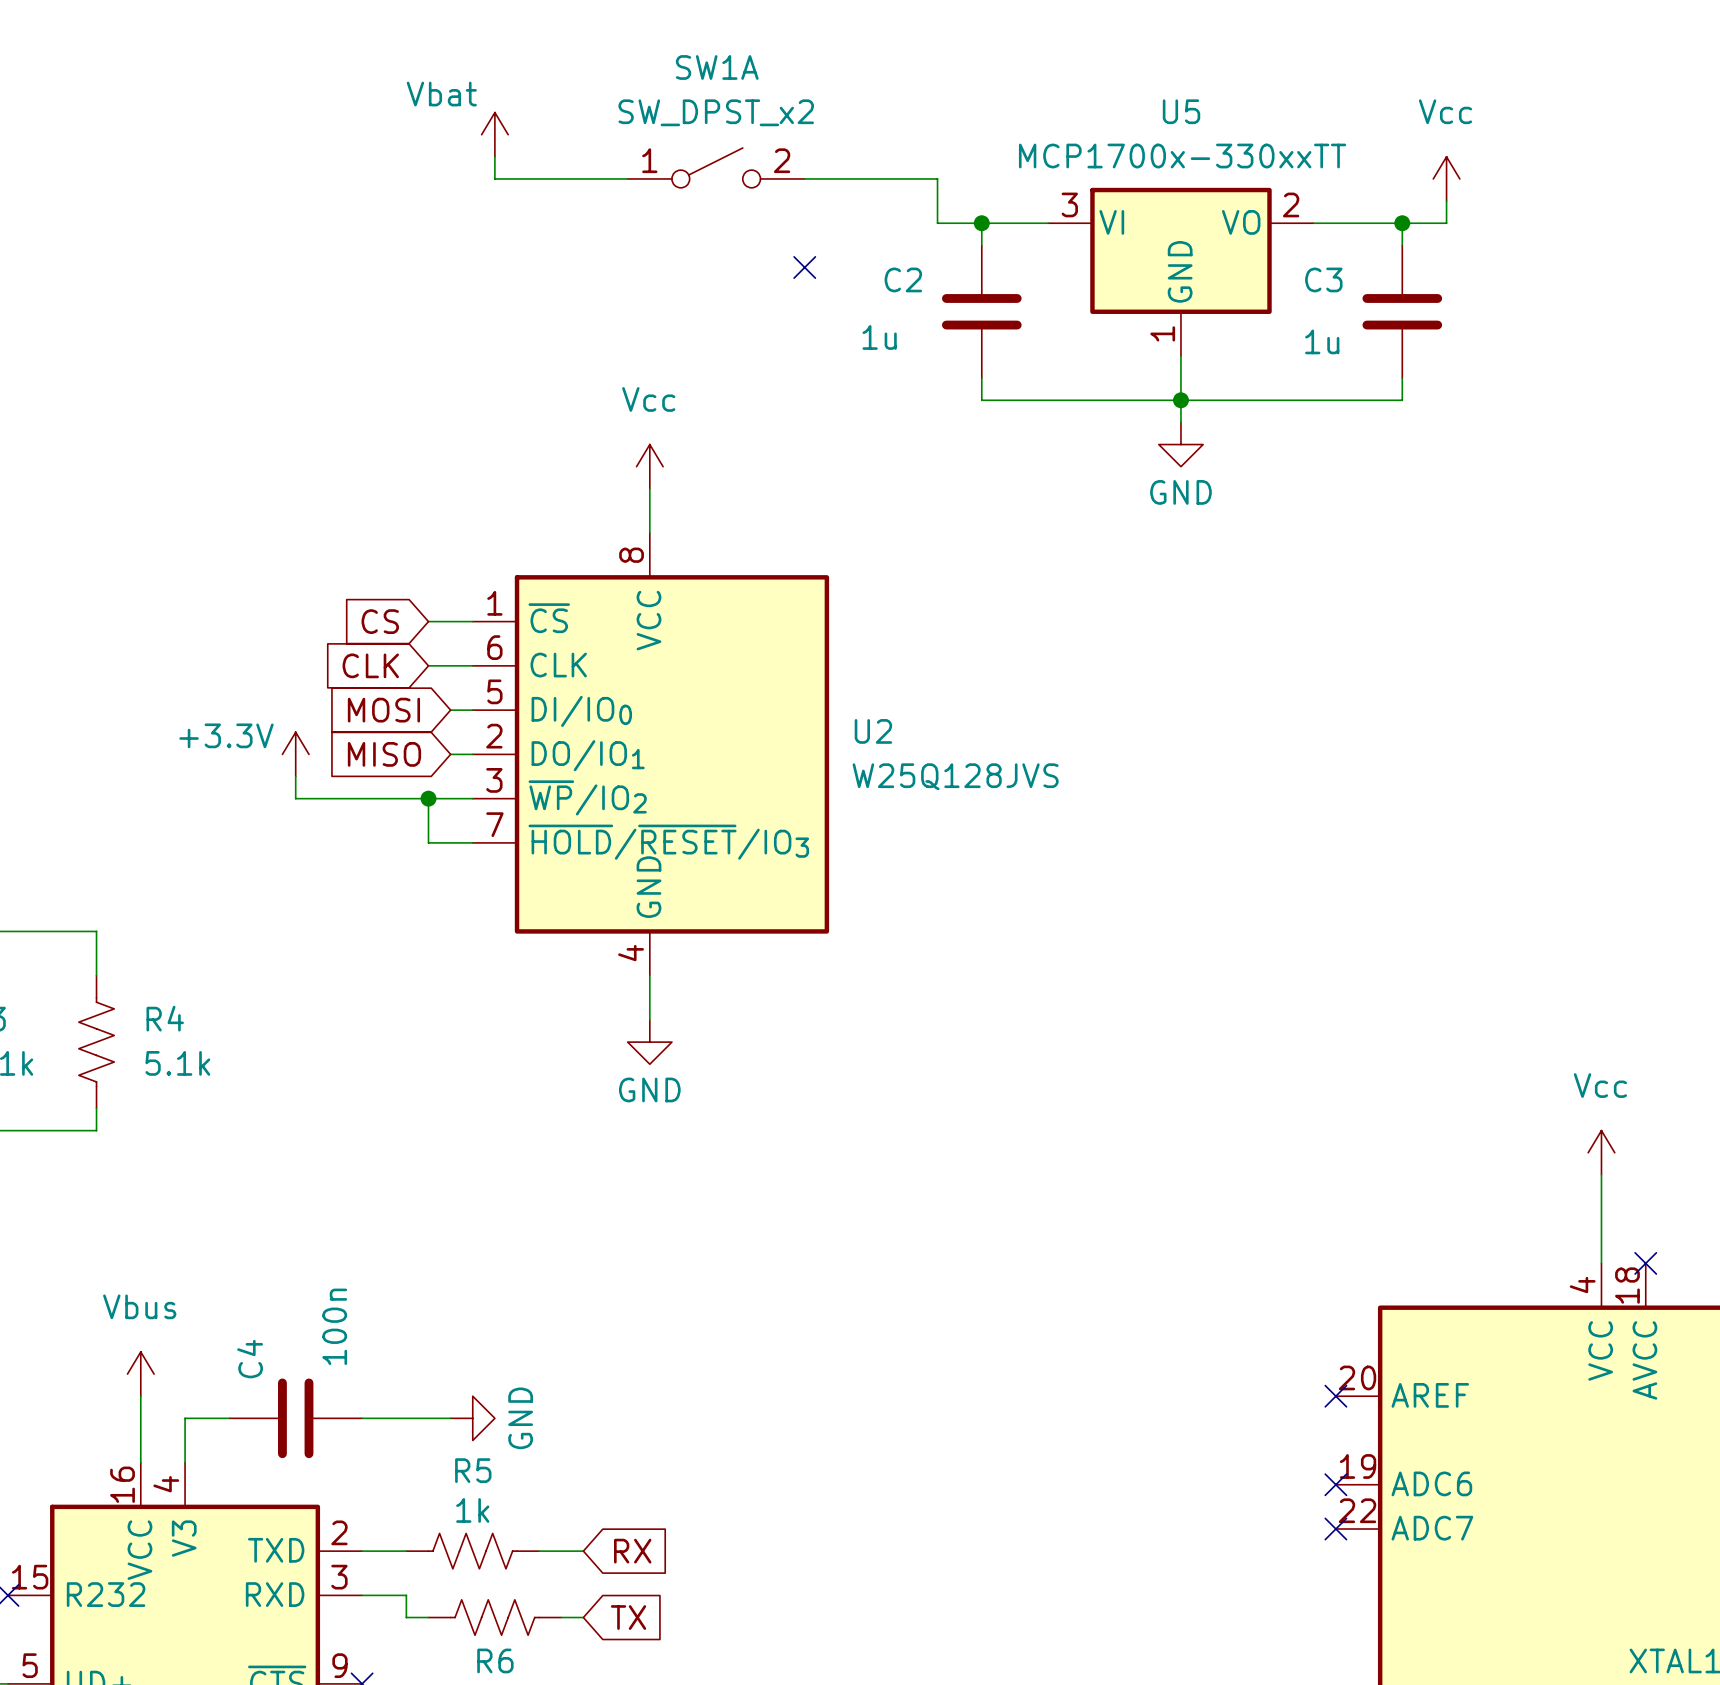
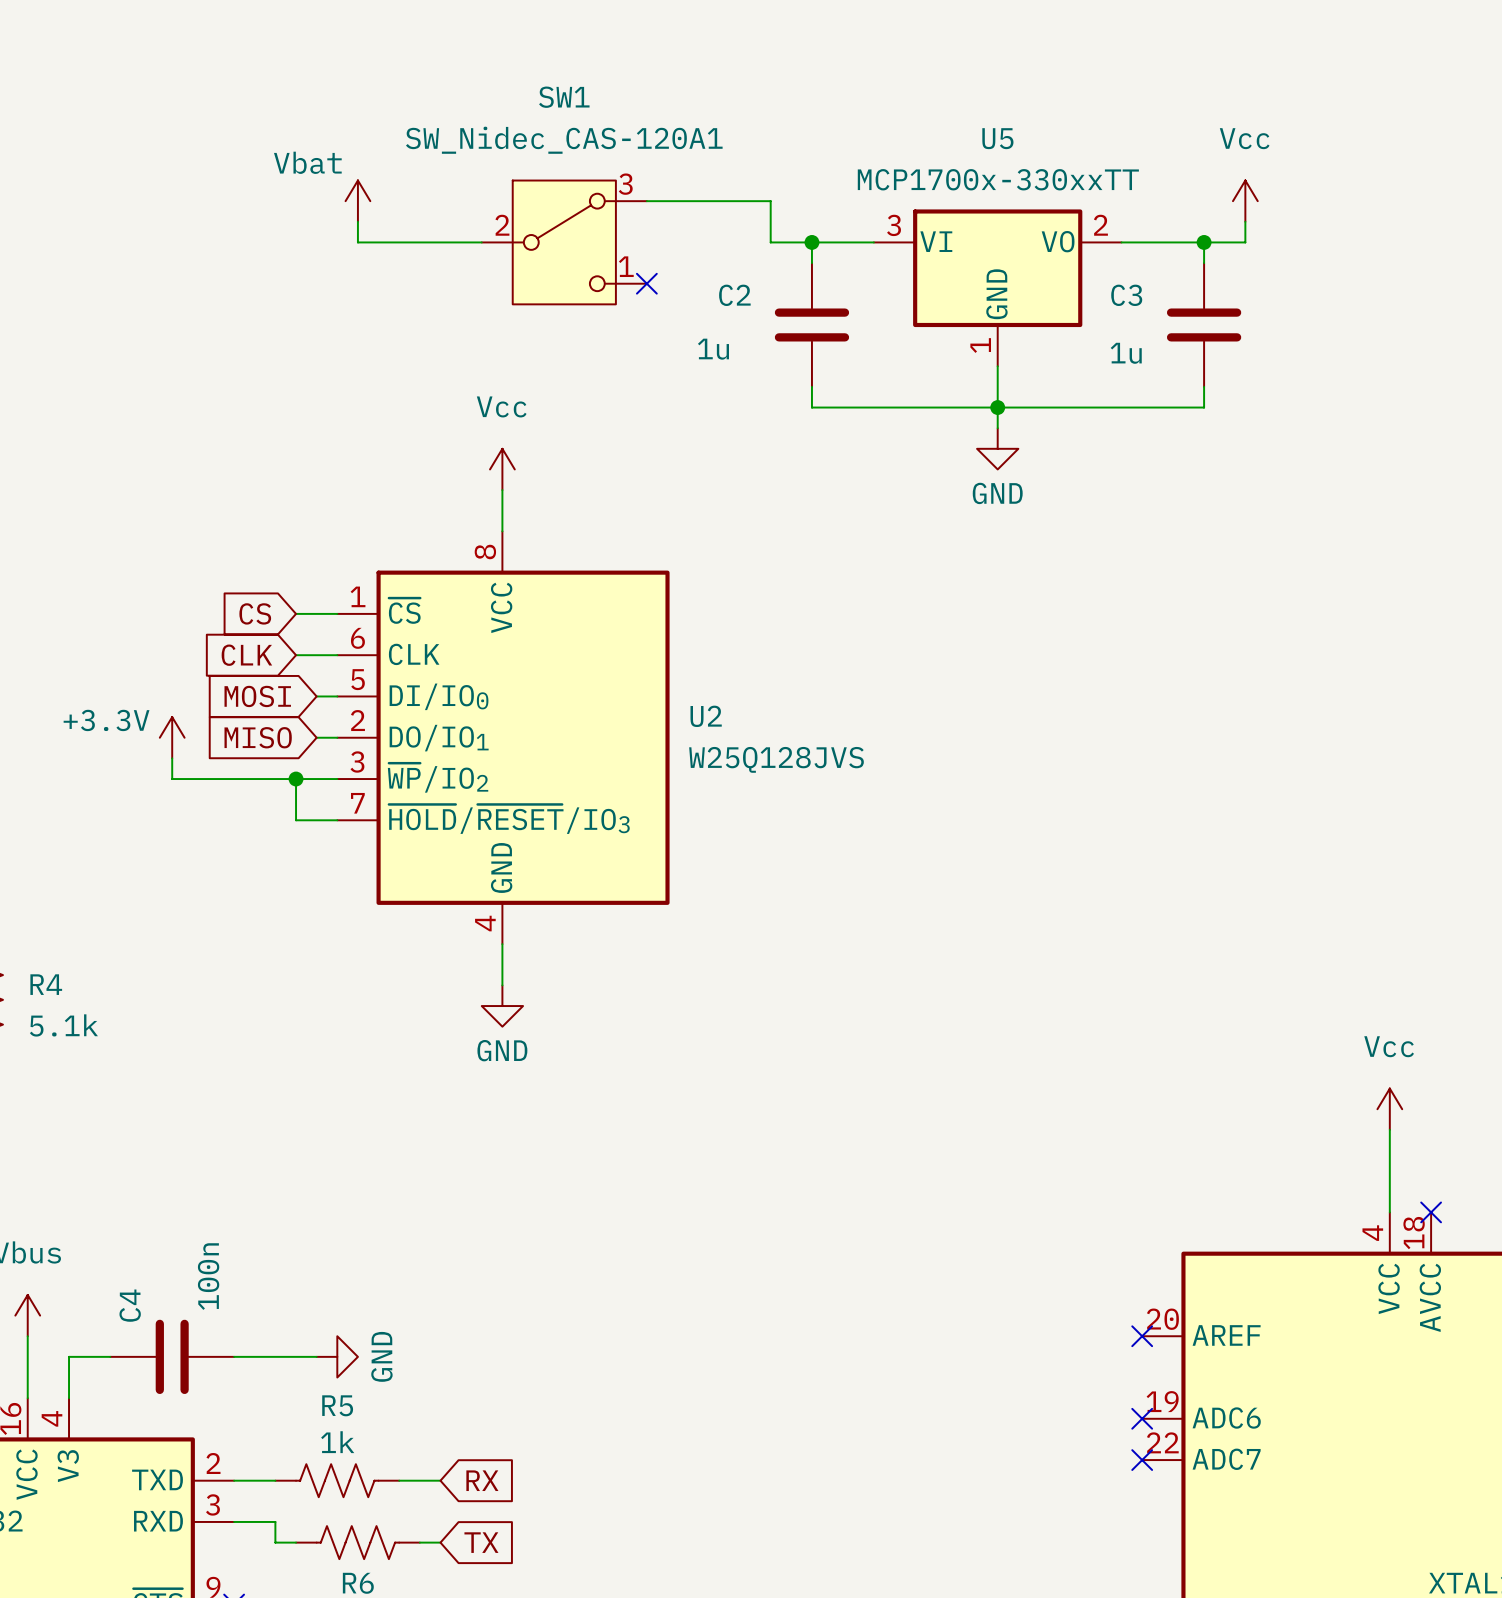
power symbol position: Vbat (494, 134) -> Vbat (357, 201)
wire: (494, 156) (494, 178) (627, 178) -> (357, 221) (357, 242) (481, 242)
SW1A: SW_DPST_x2 (716, 167) -> none
SW1: none -> SW_Nidec_CAS-120A1 (564, 242)

